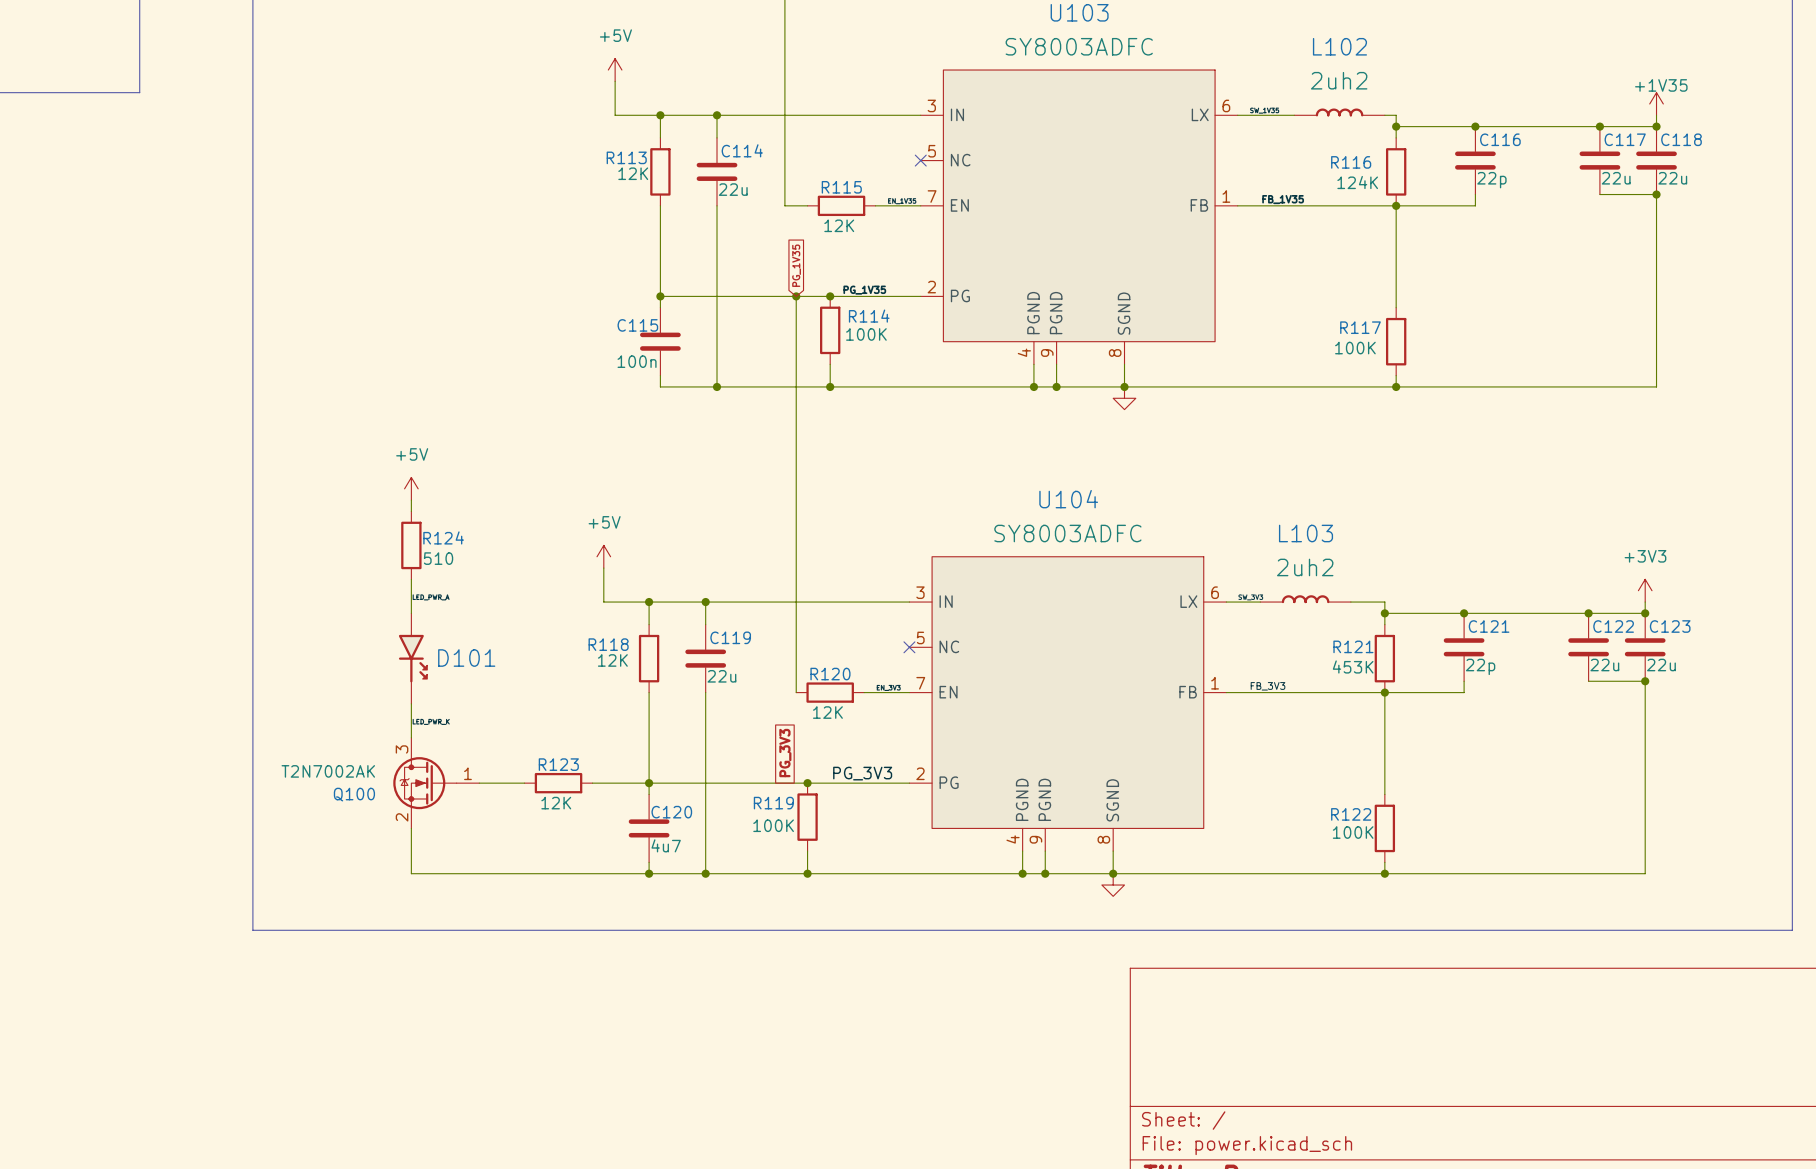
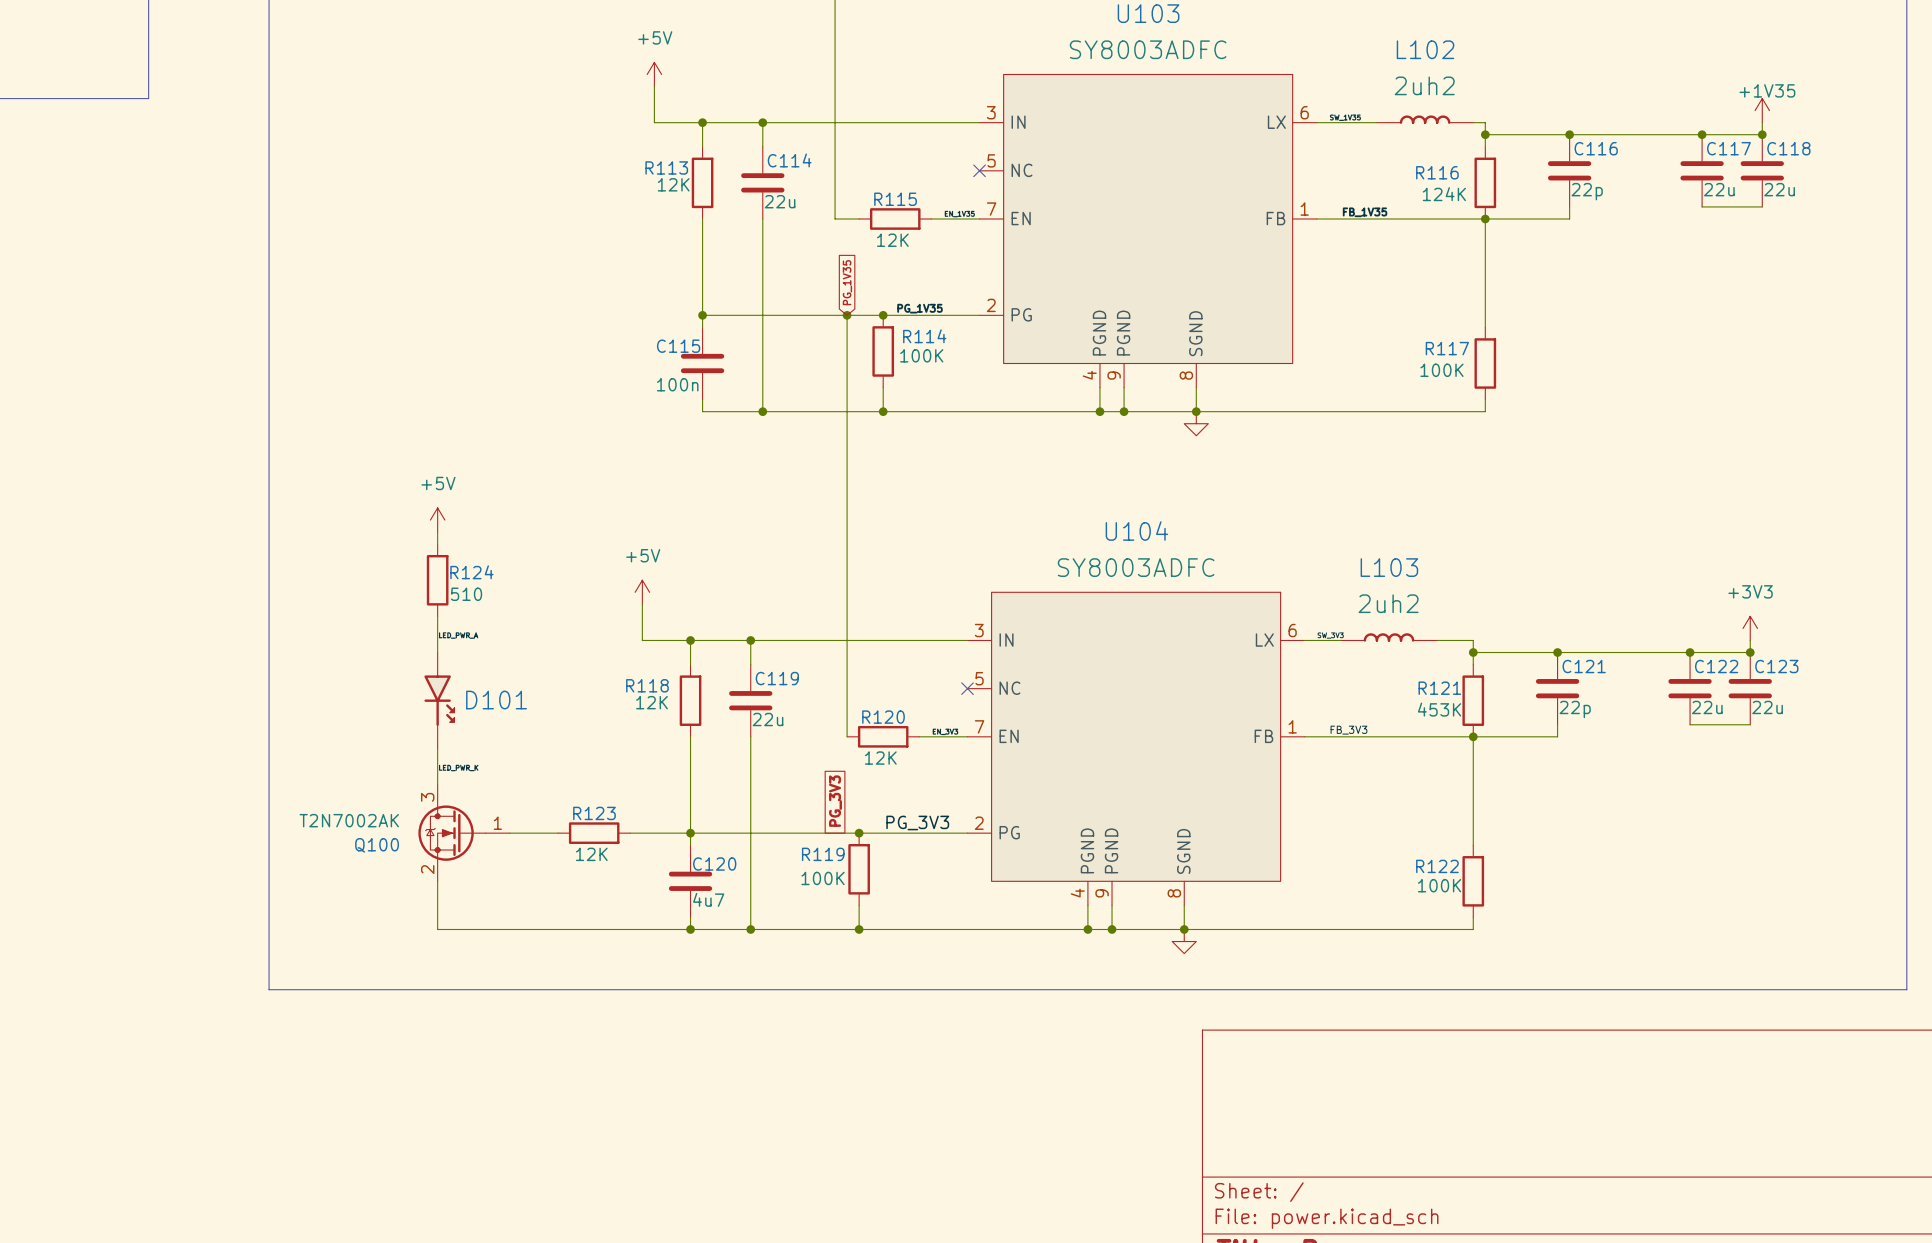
wire: (1656, 194) (1656, 386) (1396, 386) -> none
junction: (1656, 194) -> none
junction: (1396, 386) -> none
wire: (1645, 681) (1645, 873) (1384, 873) -> none
junction: (1645, 681) -> none
junction: (1384, 873) -> none

